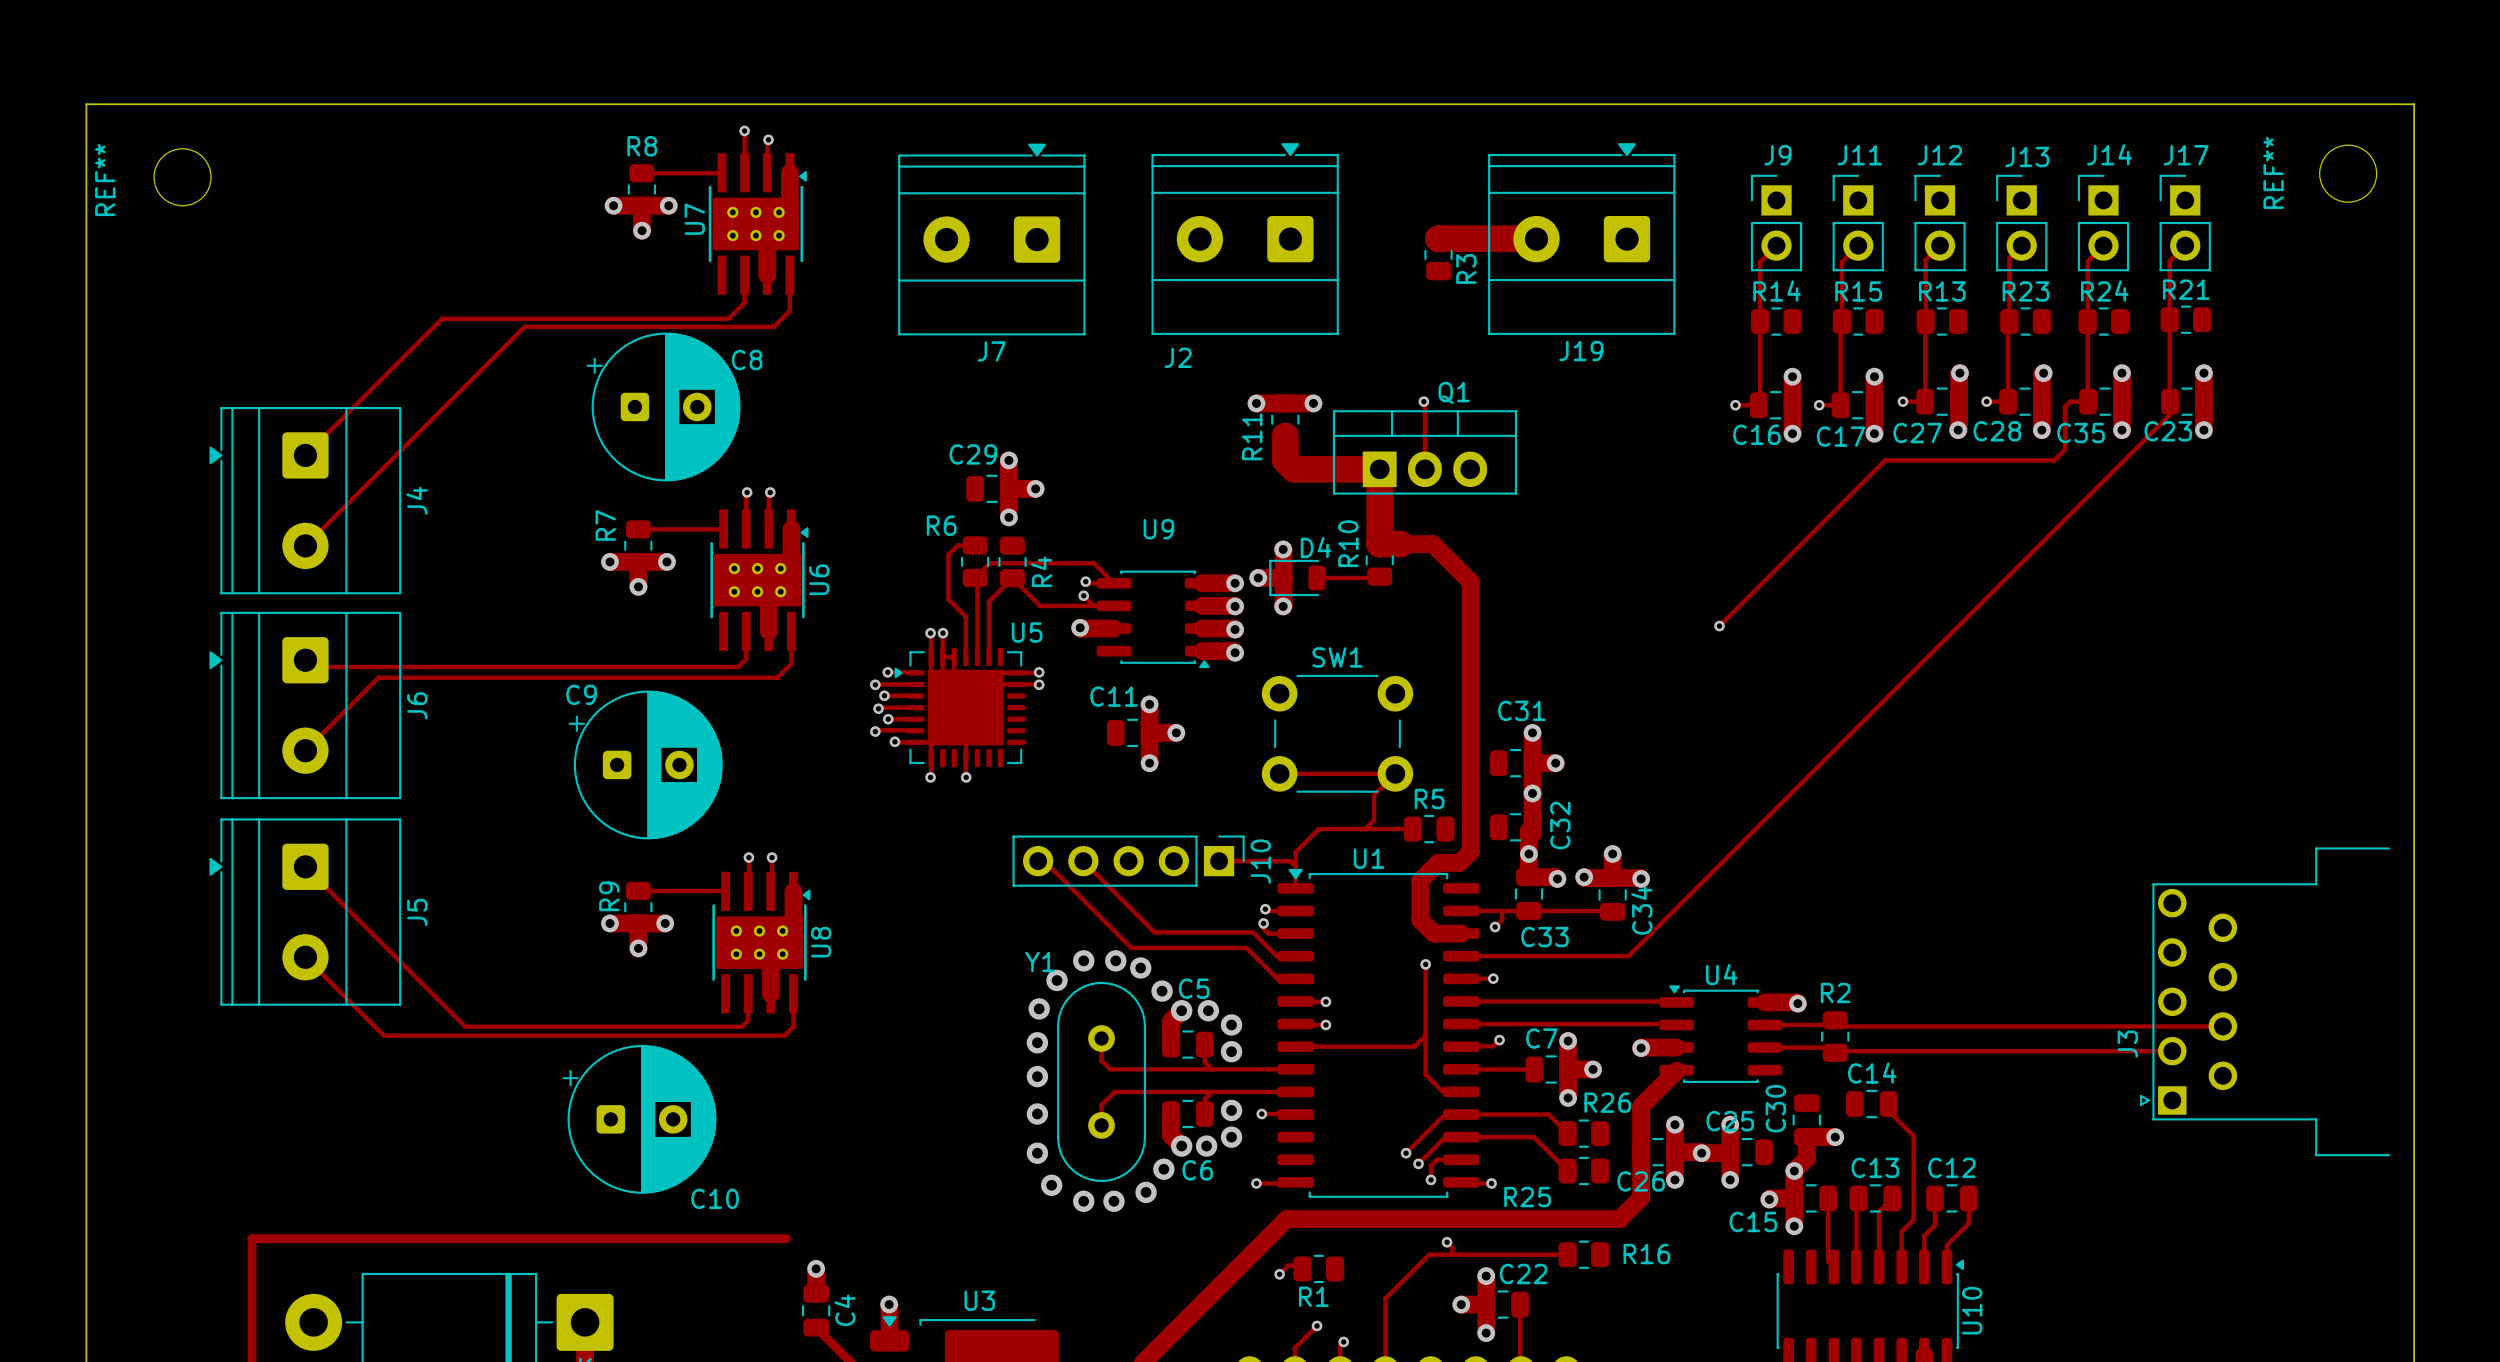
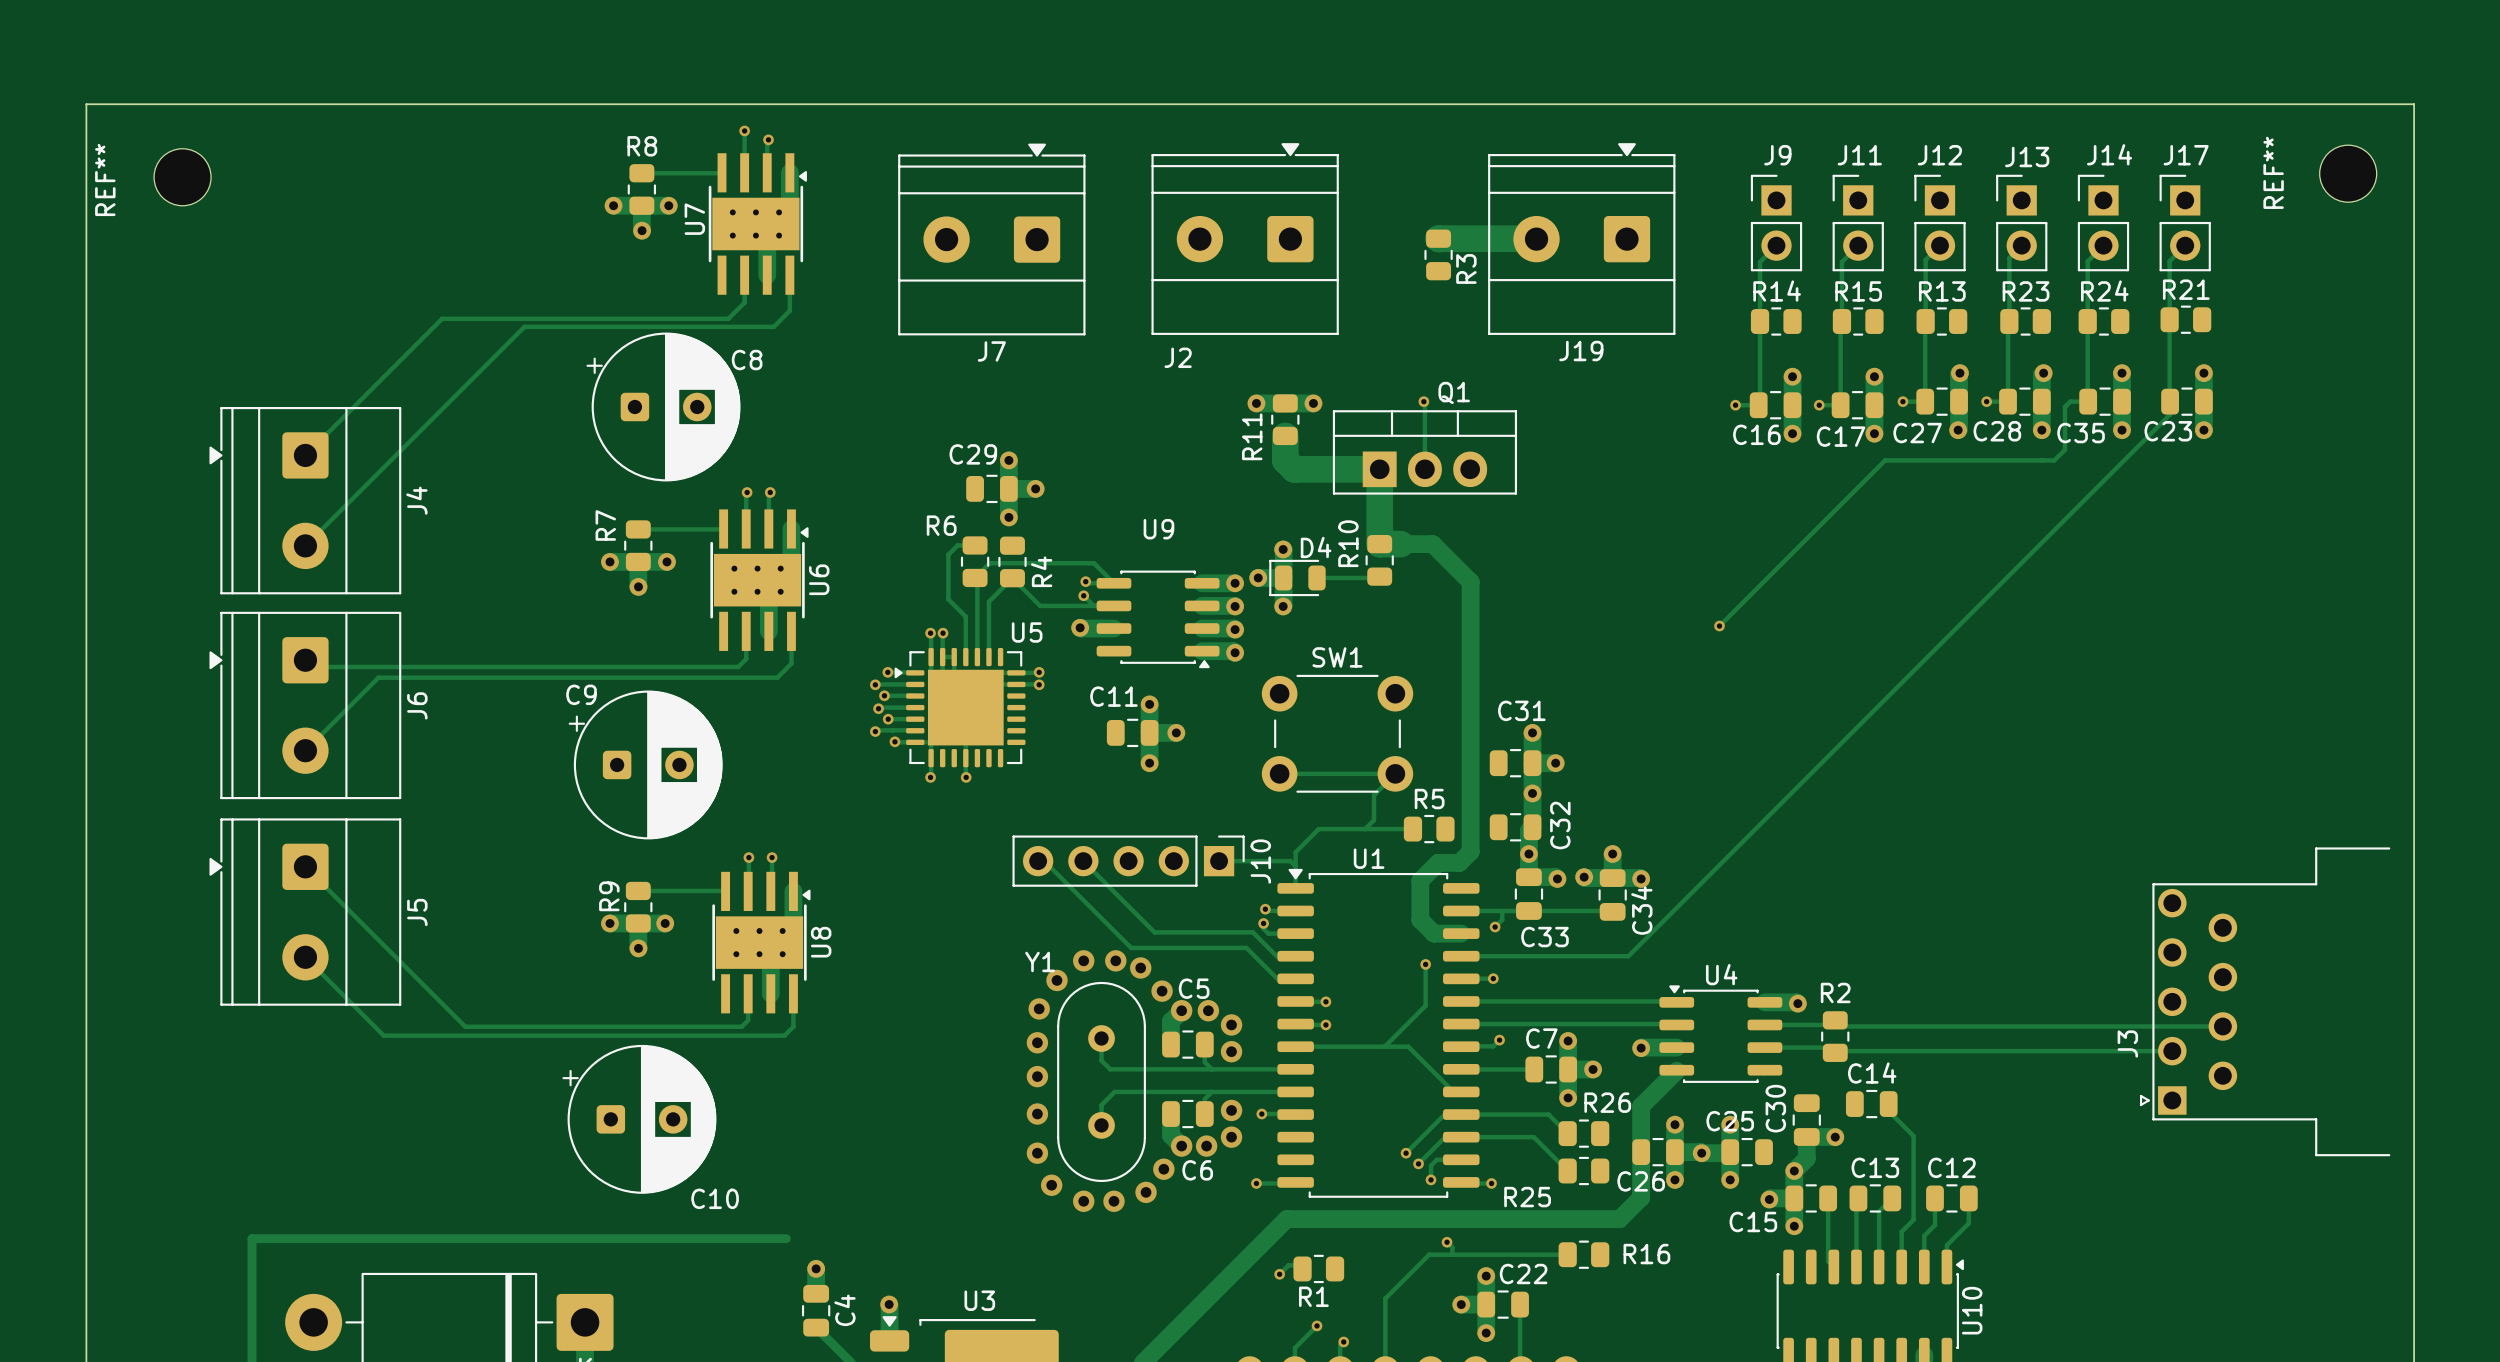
track: (1425, 1005) (1425, 1074) (1443, 1091) (1453, 1091) -> (1408, 1046) (1453, 1091)
track: none -> (1425, 1005) (1384, 1046)
track: (1425, 1035) (1414, 1046) (1408, 1046) -> none

